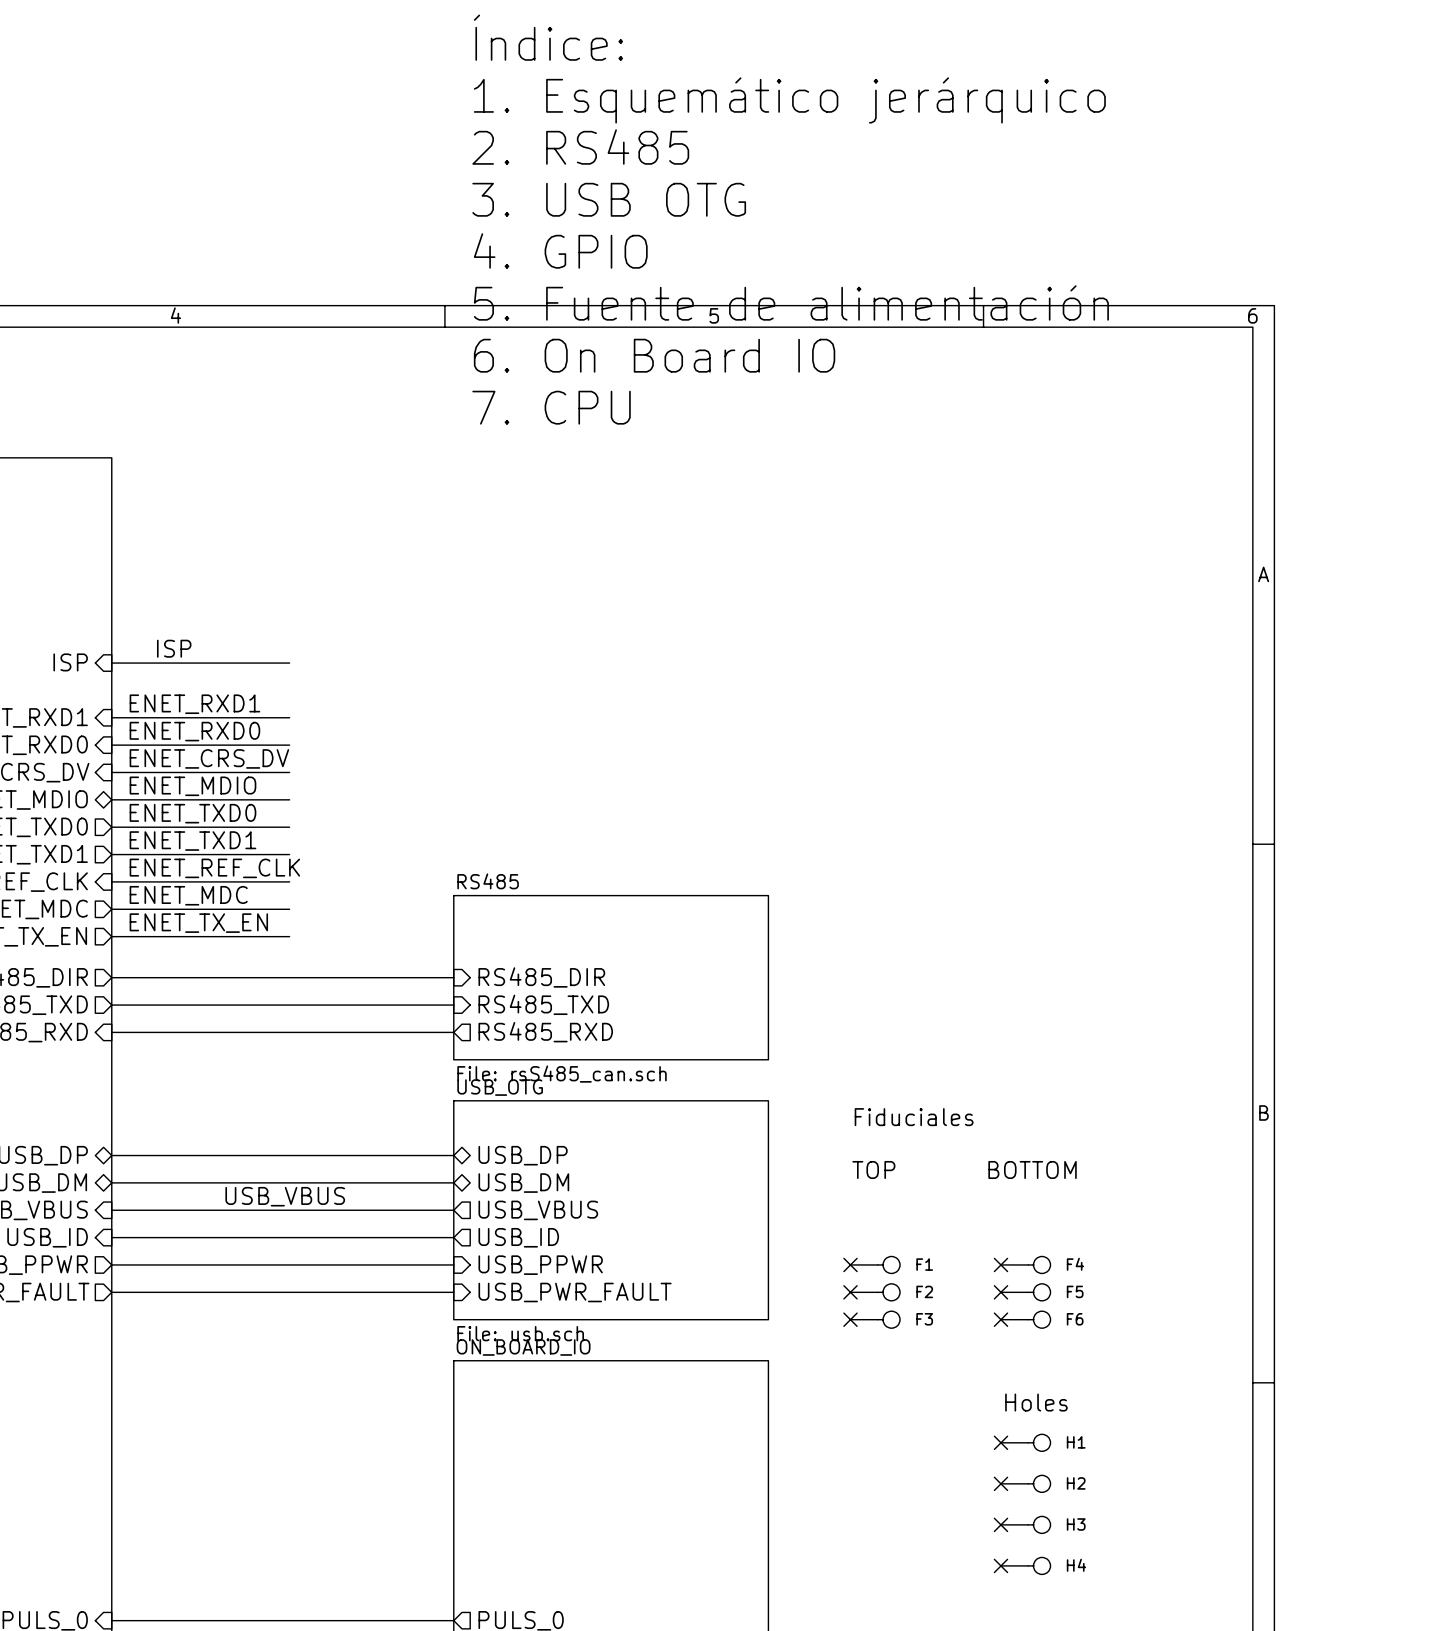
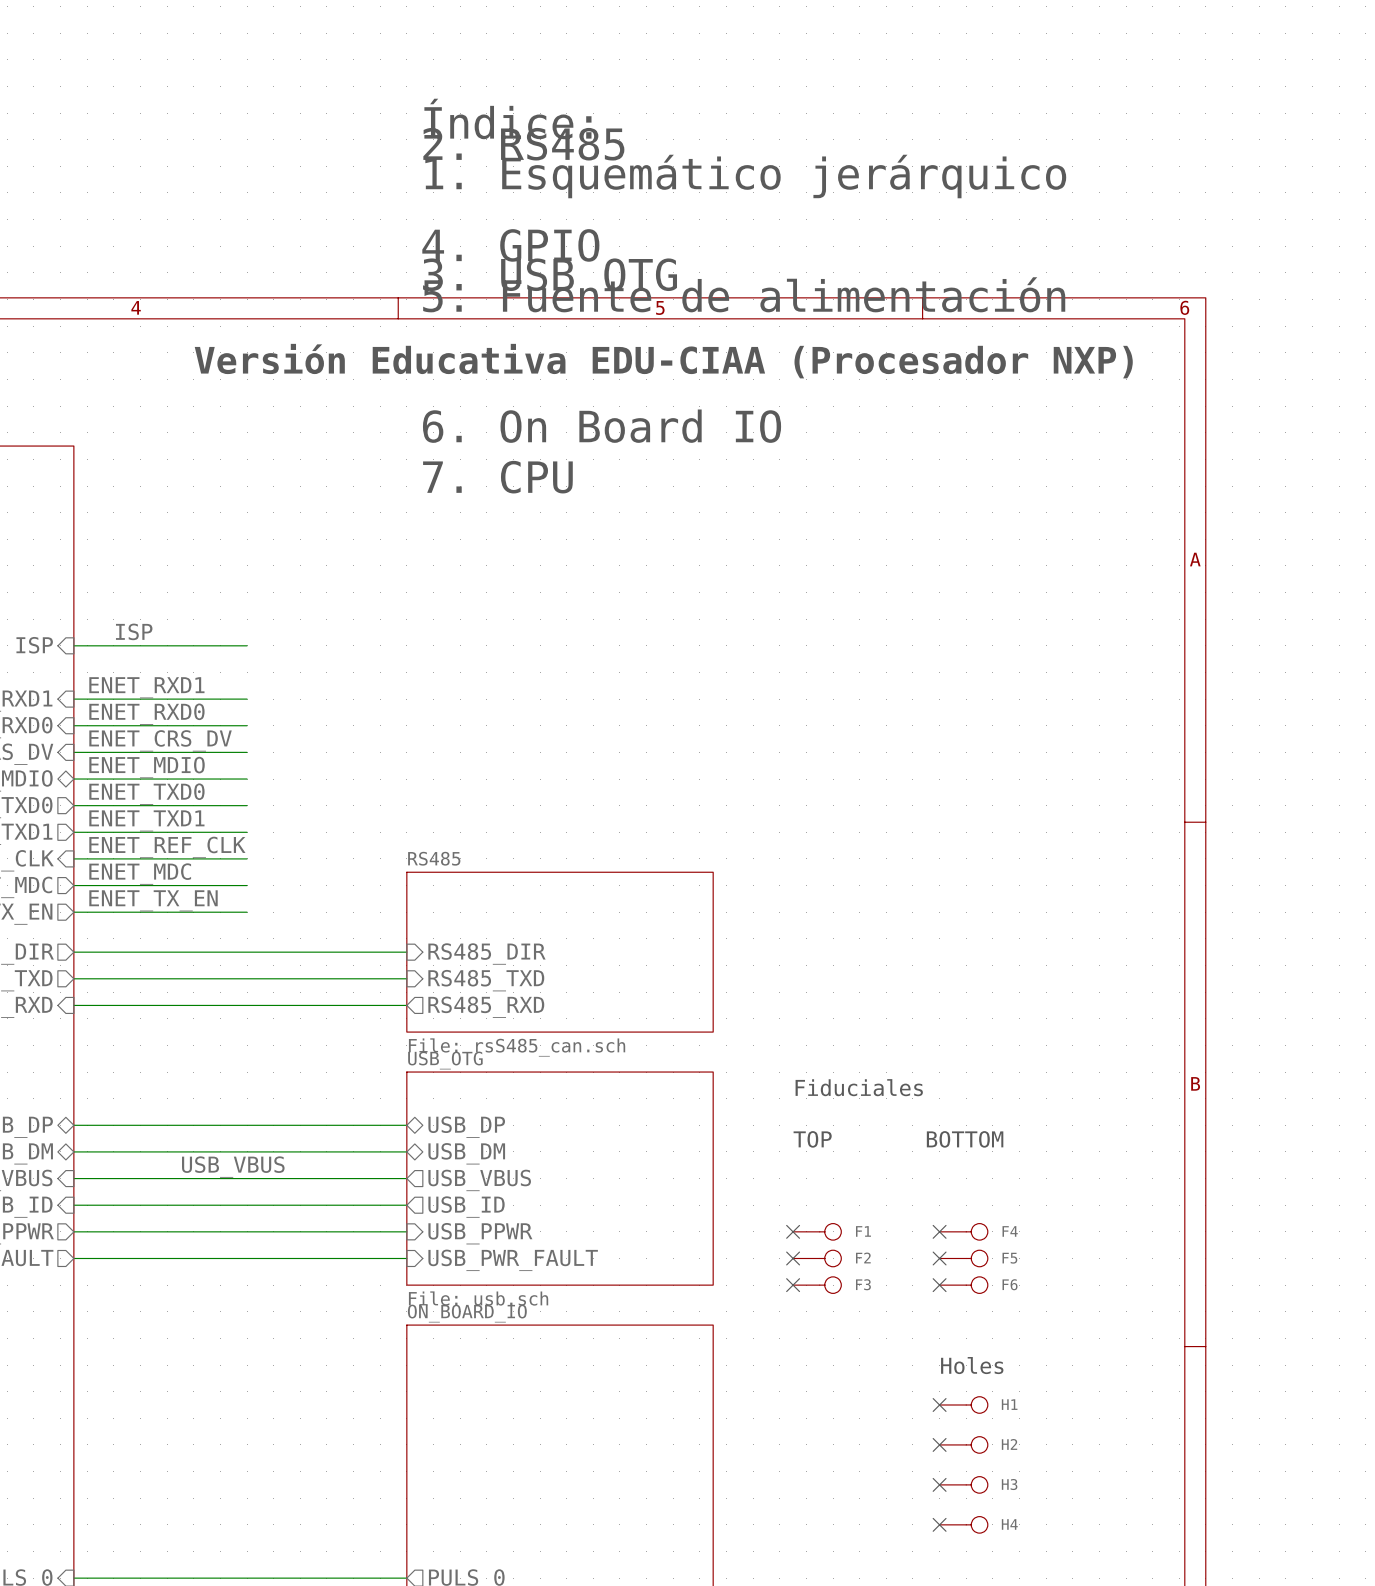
text position: Índice: (548, 37) -> Índice: (507, 118)
text position: 1. Esquemático jerárquico (789, 100) -> 1. Esquemático jerárquico (745, 176)
text position: 3. USB OTG (609, 199) -> 3. USB OTG (550, 274)
text position: 6. On Board IO (654, 355) -> 6. On Board IO (602, 426)
text: none -> Versión Educativa EDU-CIAA (Procesador NXP) (663, 361)
text position: 7. CPU (551, 407) -> 7. CPU (497, 477)

